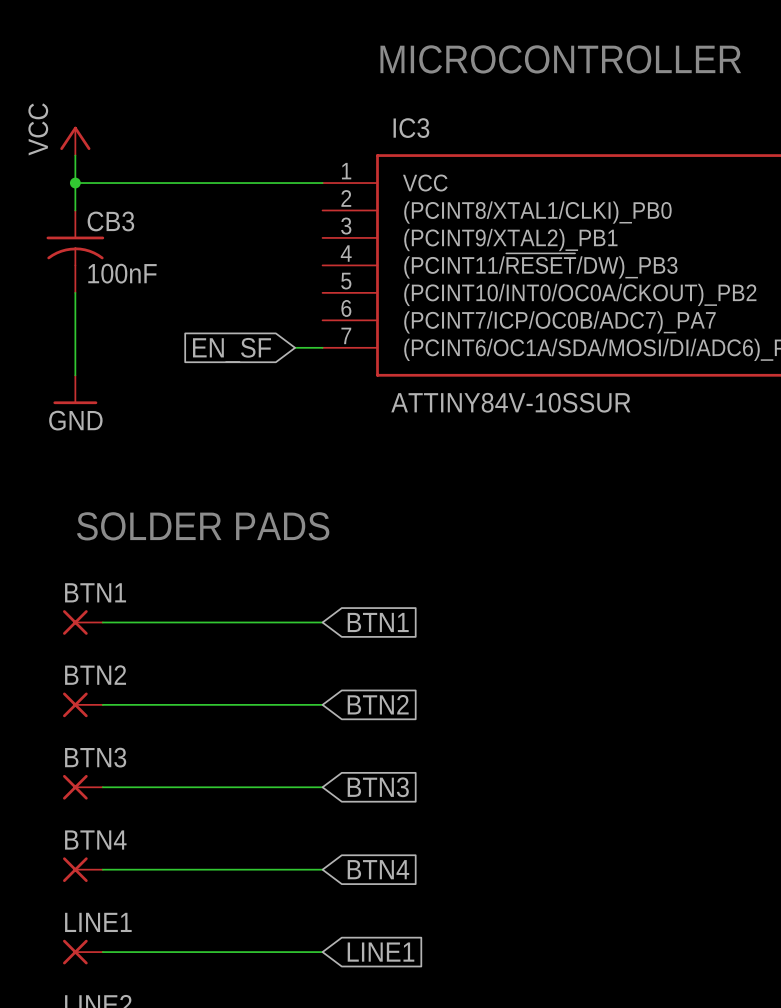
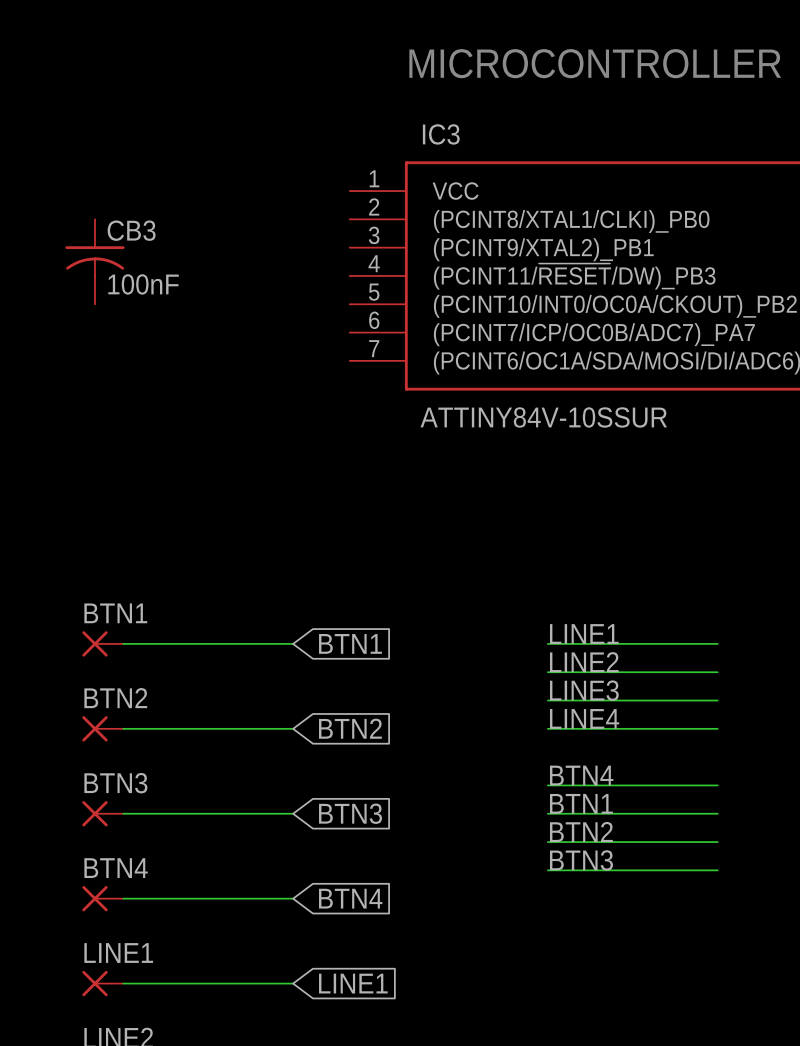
power symbol: VCC (75, 141) -> none
wire: (75, 155) (75, 210) -> none
wire: (75, 183) (322, 183) -> none
junction: (75, 183) -> none
wire: (75, 292) (75, 375) -> none
wire: (295, 347) (322, 347) -> none
global label: EN_SF (232, 350) -> none
power symbol: GND (75, 389) -> none
text: SOLDER PADS (203, 526) -> none
label: none -> LINE1 (584, 634)
wire: (267, 622) (322, 622) -> none
global label position: BTN1 (378, 622) -> BTN1 (350, 643)
wire: none -> (547, 643) (717, 643)
label: none -> LINE2 (584, 662)
wire: none -> (547, 672) (717, 672)
label: none -> LINE3 (584, 690)
wire: none -> (547, 700) (717, 700)
label: none -> LINE4 (584, 718)
wire: (267, 704) (322, 704) -> none
global label position: BTN2 (378, 704) -> BTN2 (350, 728)
wire: none -> (547, 728) (717, 728)
label: none -> BTN4 (581, 775)
wire: none -> (547, 785) (717, 785)
label: none -> BTN1 (581, 803)
wire: (267, 787) (322, 787) -> none
global label position: BTN3 (378, 787) -> BTN3 (350, 813)
wire: none -> (547, 813) (717, 813)
label: none -> BTN2 (581, 832)
wire: none -> (547, 842) (717, 842)
label: none -> BTN3 (581, 860)
wire: none -> (547, 870) (717, 870)
wire: (267, 869) (322, 869) -> none
global label position: BTN4 (378, 869) -> BTN4 (350, 898)
wire: (267, 952) (322, 952) -> none
global label position: LINE1 (381, 952) -> LINE1 (353, 983)

